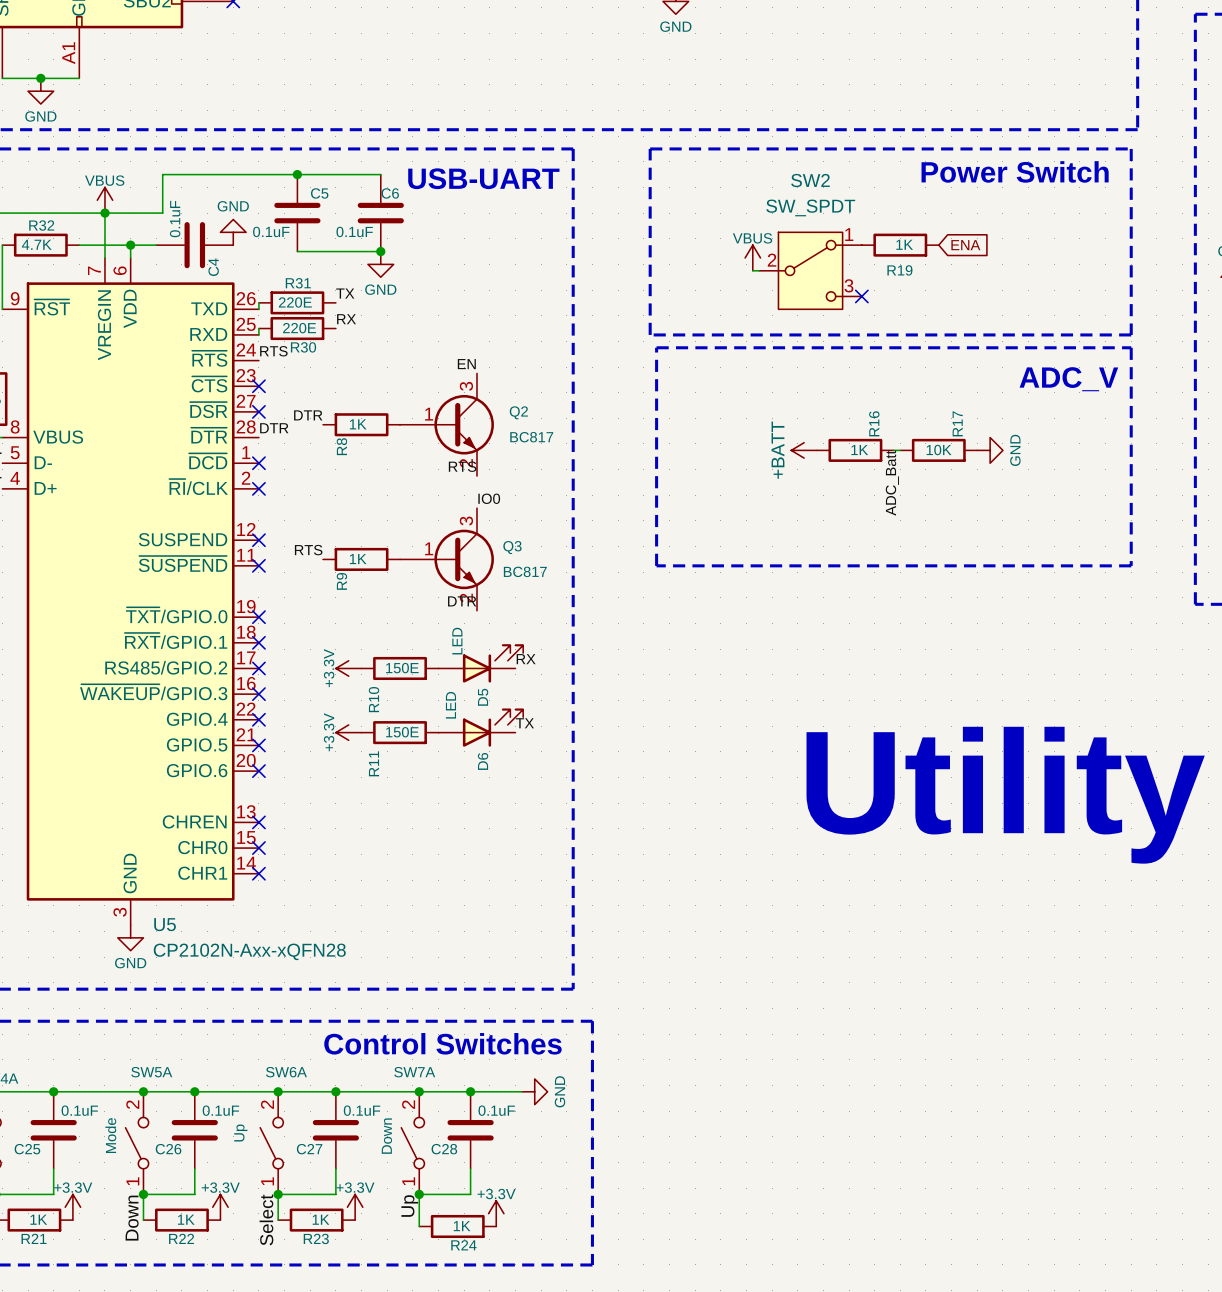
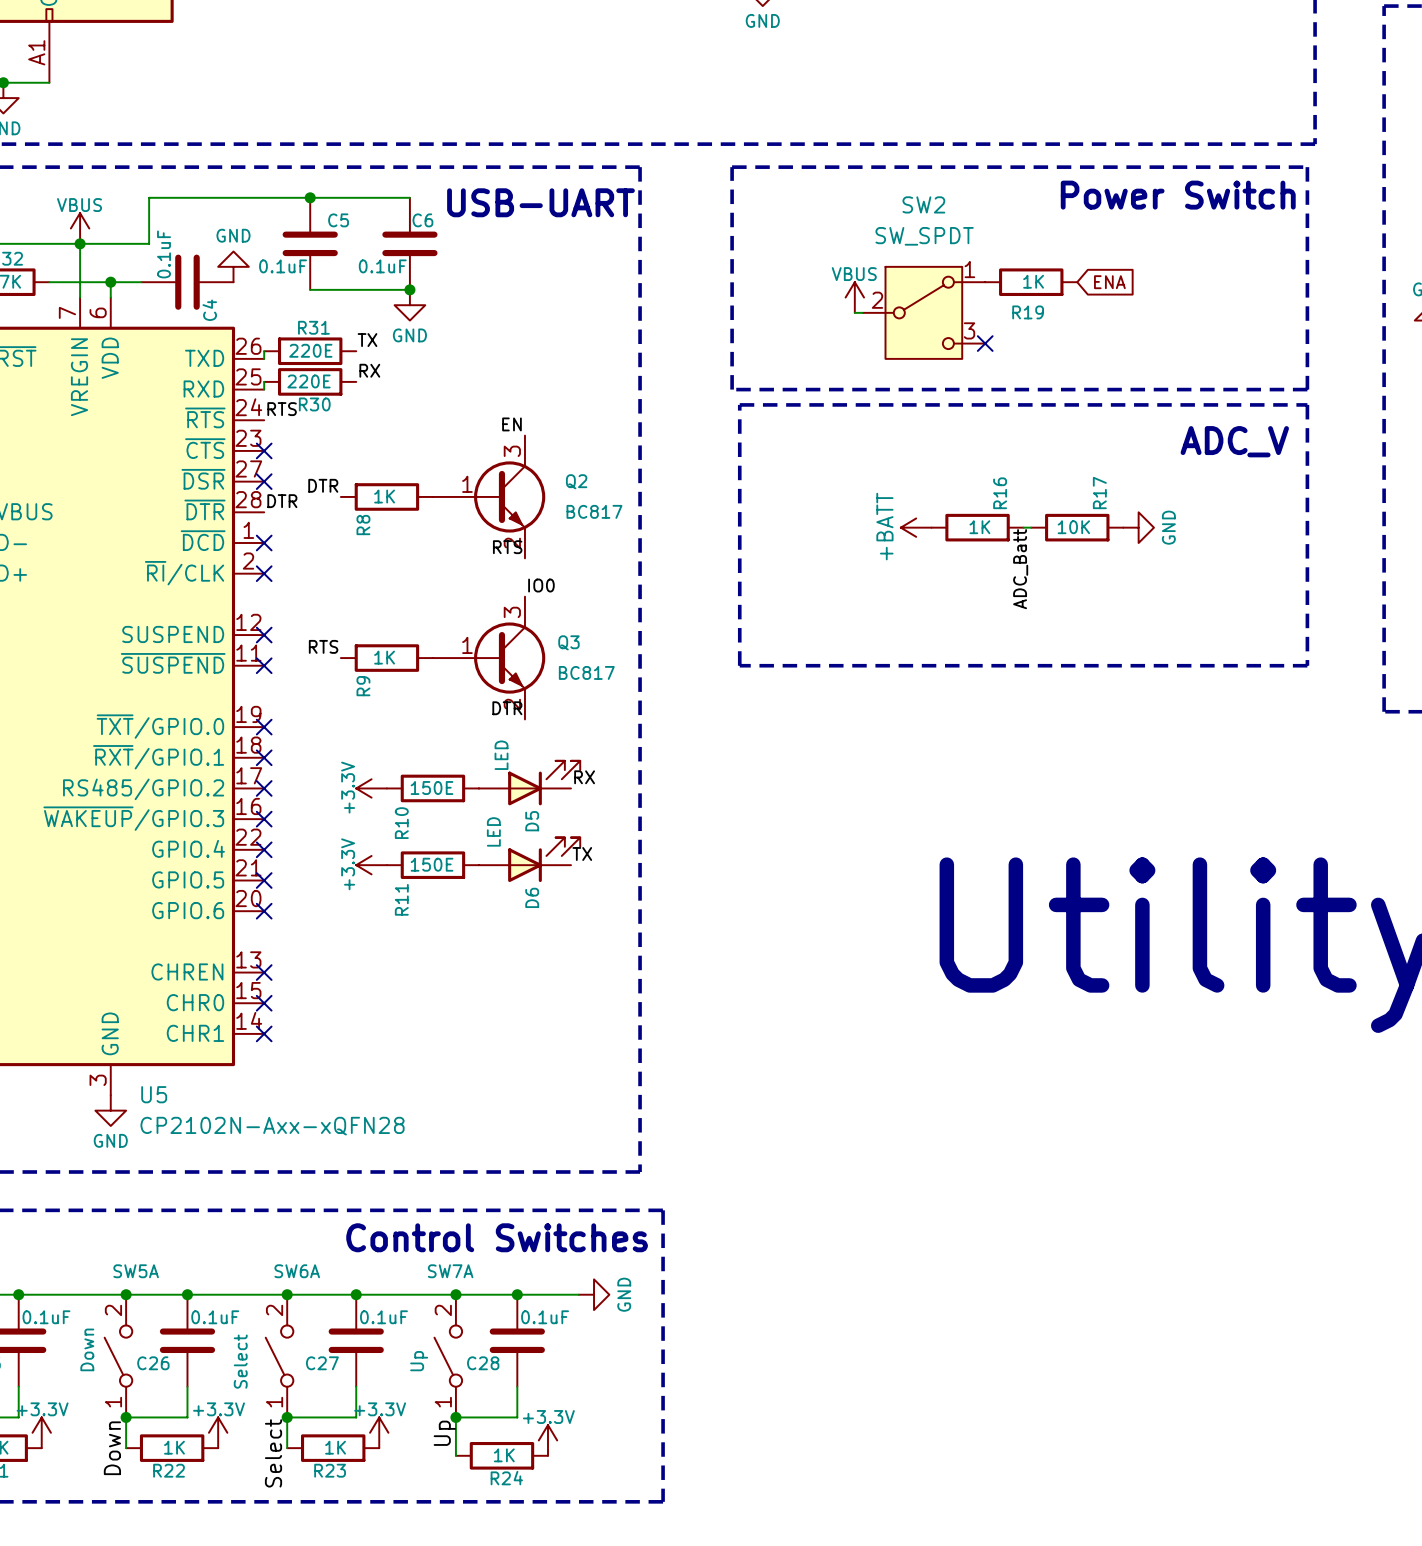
SW6A value: Up (240, 1132) -> Select (240, 1361)
SW5A value: Mode (110, 1135) -> Down (87, 1349)
SW7A value: Down (386, 1136) -> Up (419, 1361)

